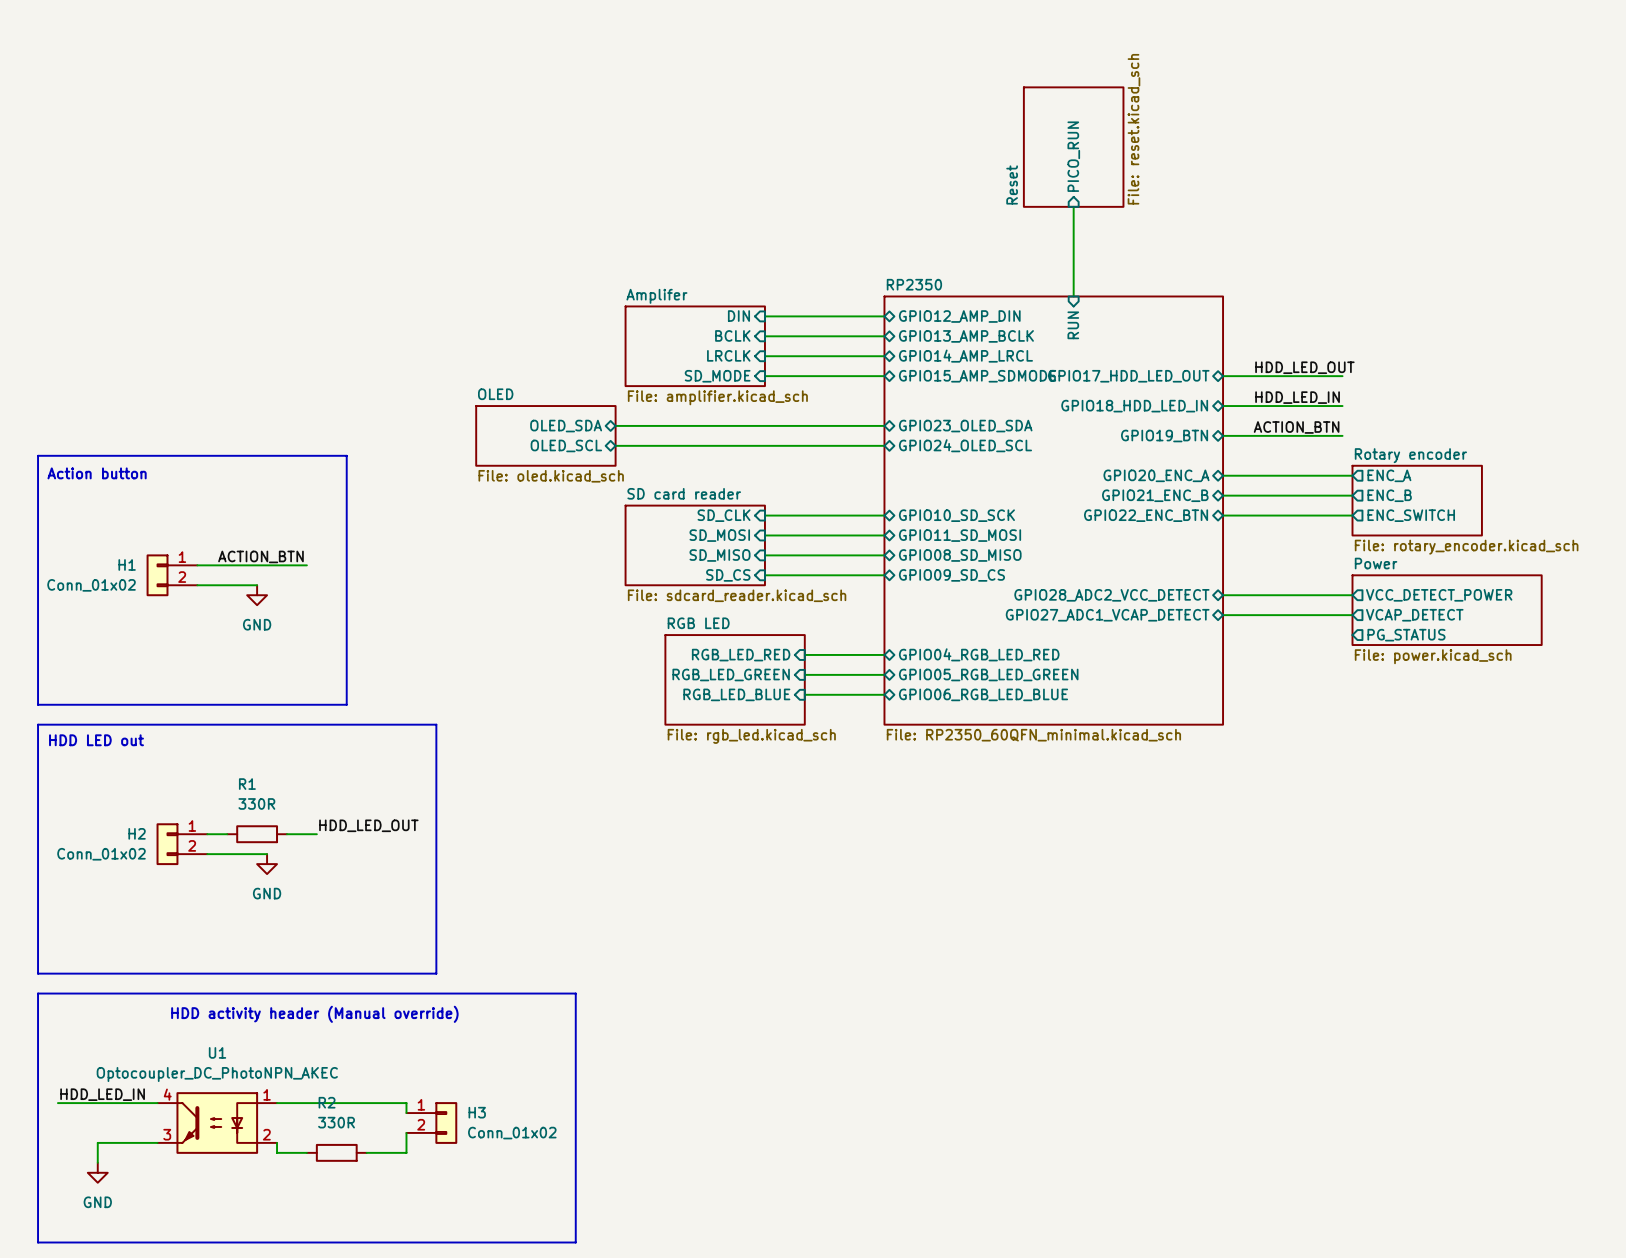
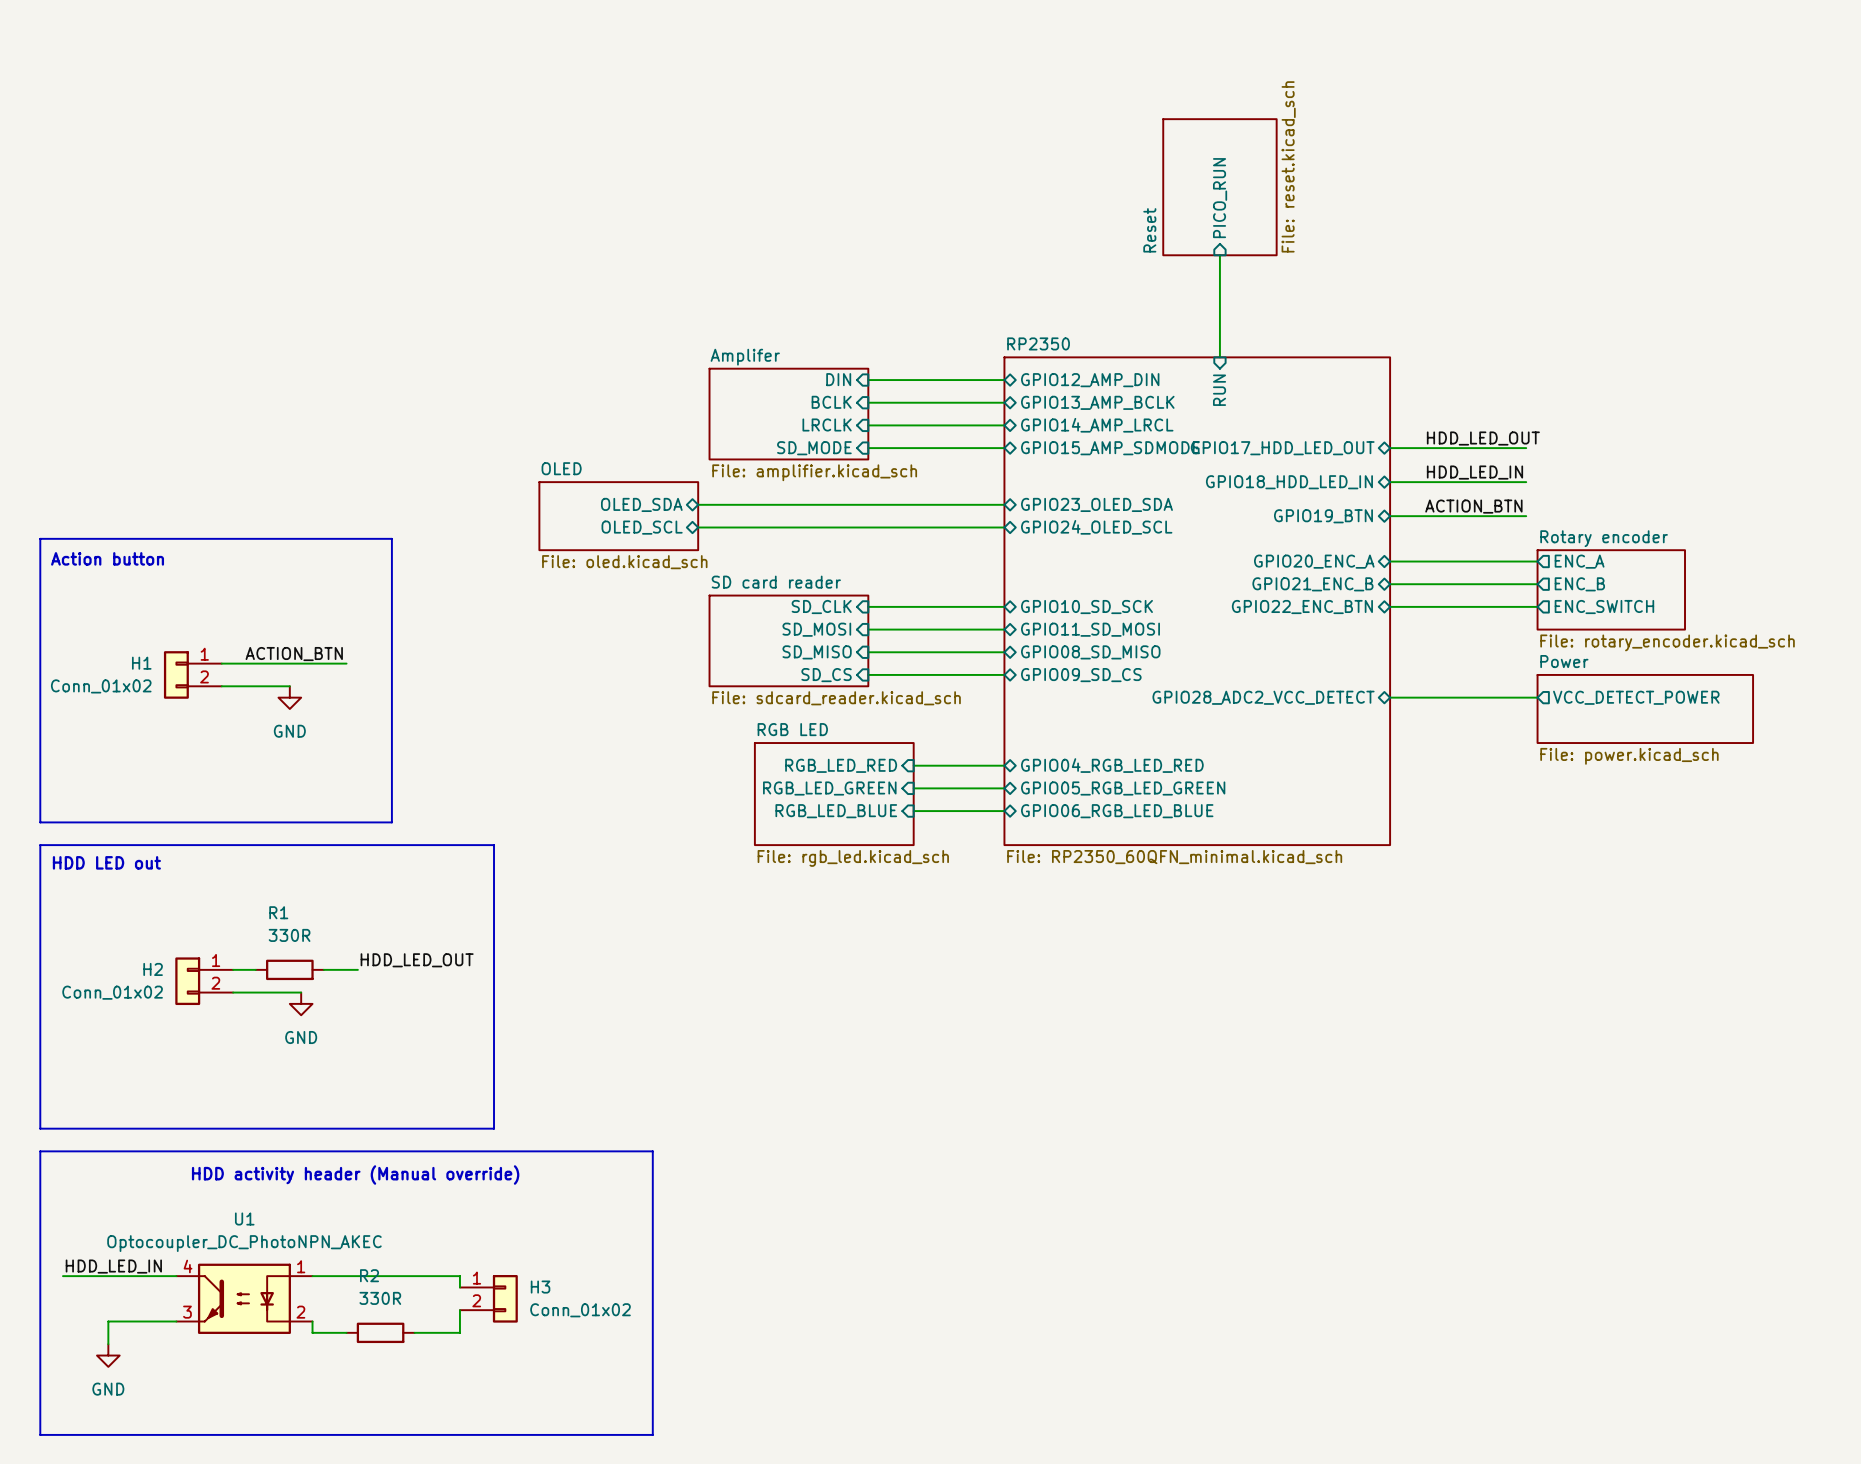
sheet Power shape: [1351, 574, 1543, 646] -> [1536, 674, 1754, 744]
sheet pin: GPIO27_ADC1_VCAP_DETECT (1107, 615) -> none
wire: (1223, 615) (1352, 615) -> none
sheet pin: VCAP_DETECT (1414, 615) -> none
sheet pin: PG_STATUS (1406, 635) -> none

